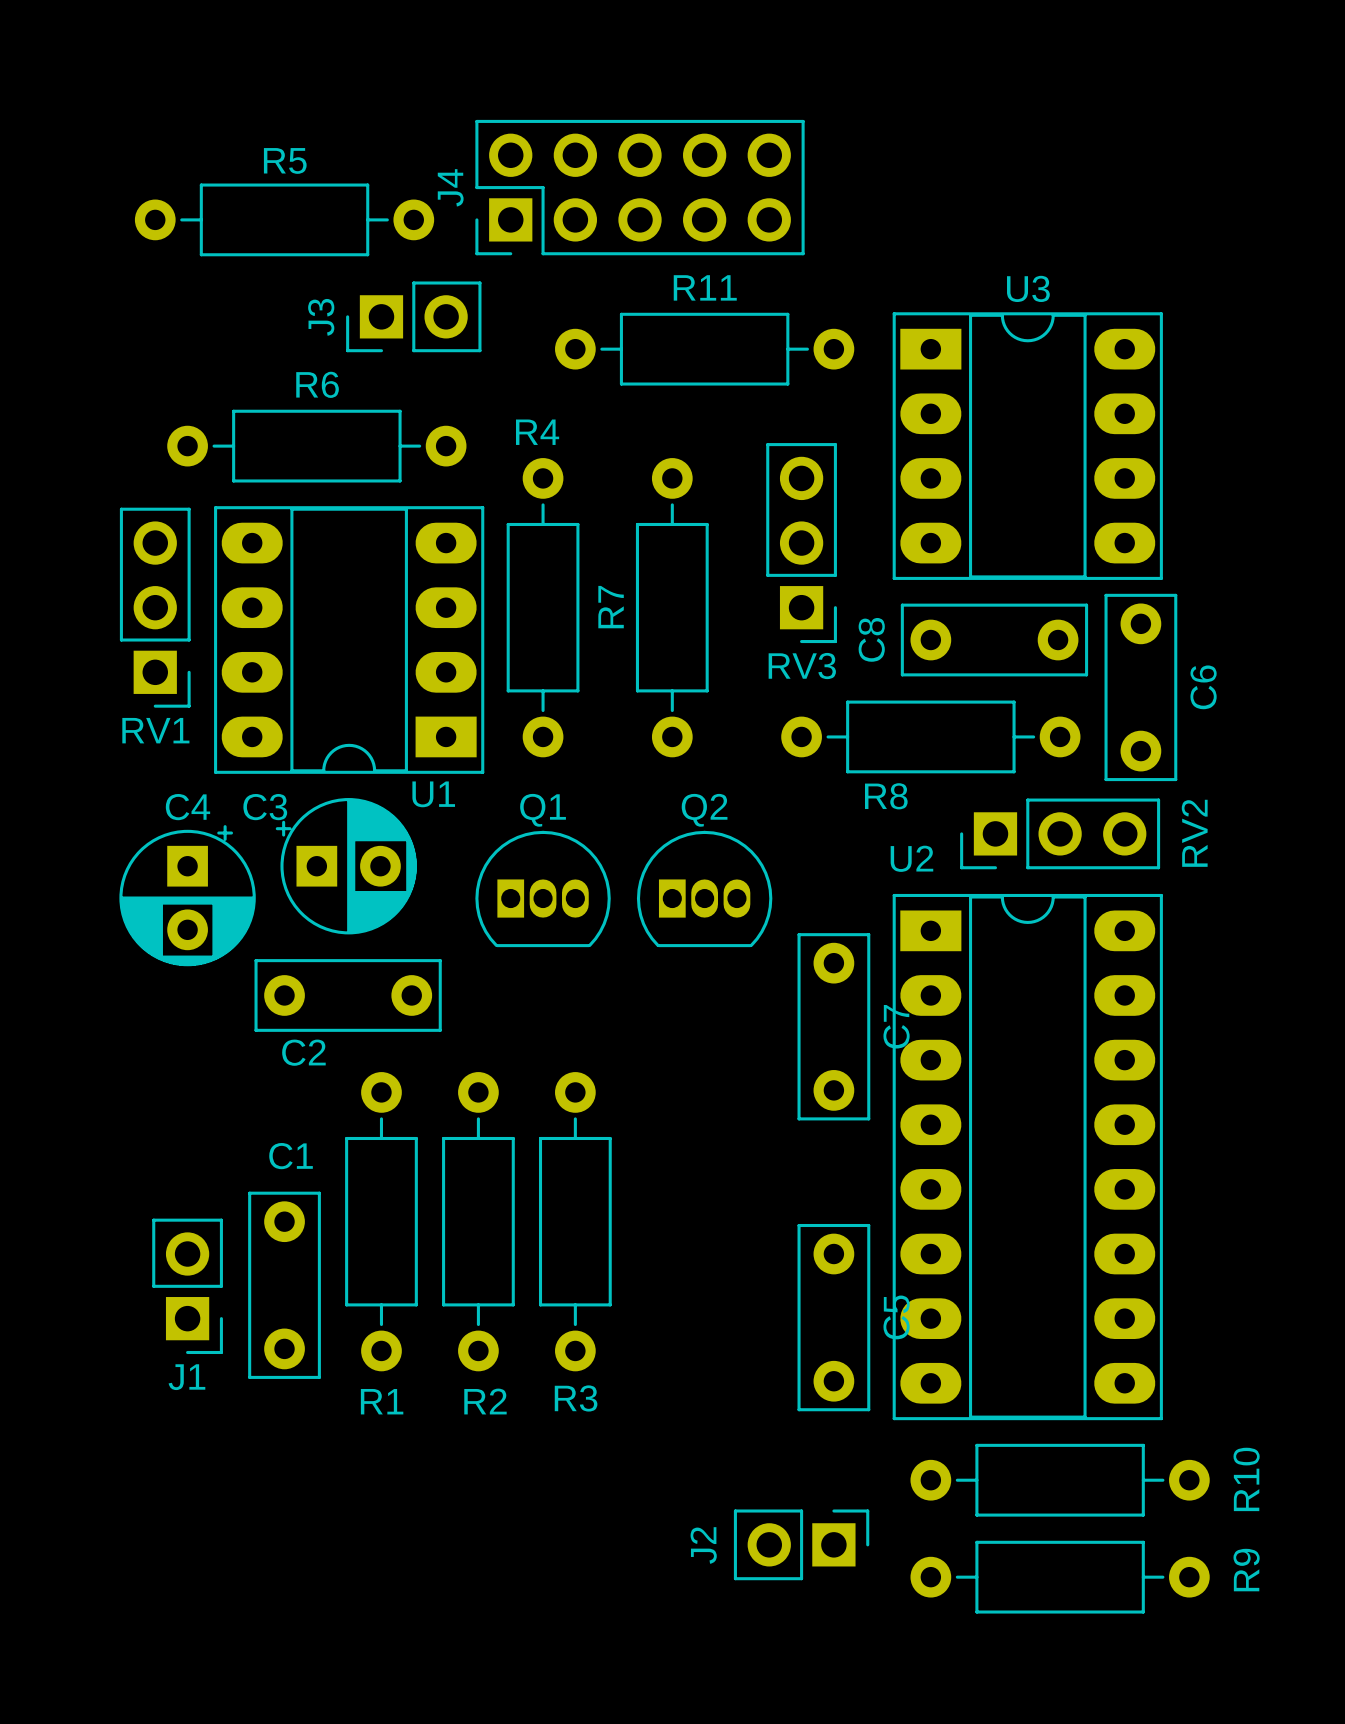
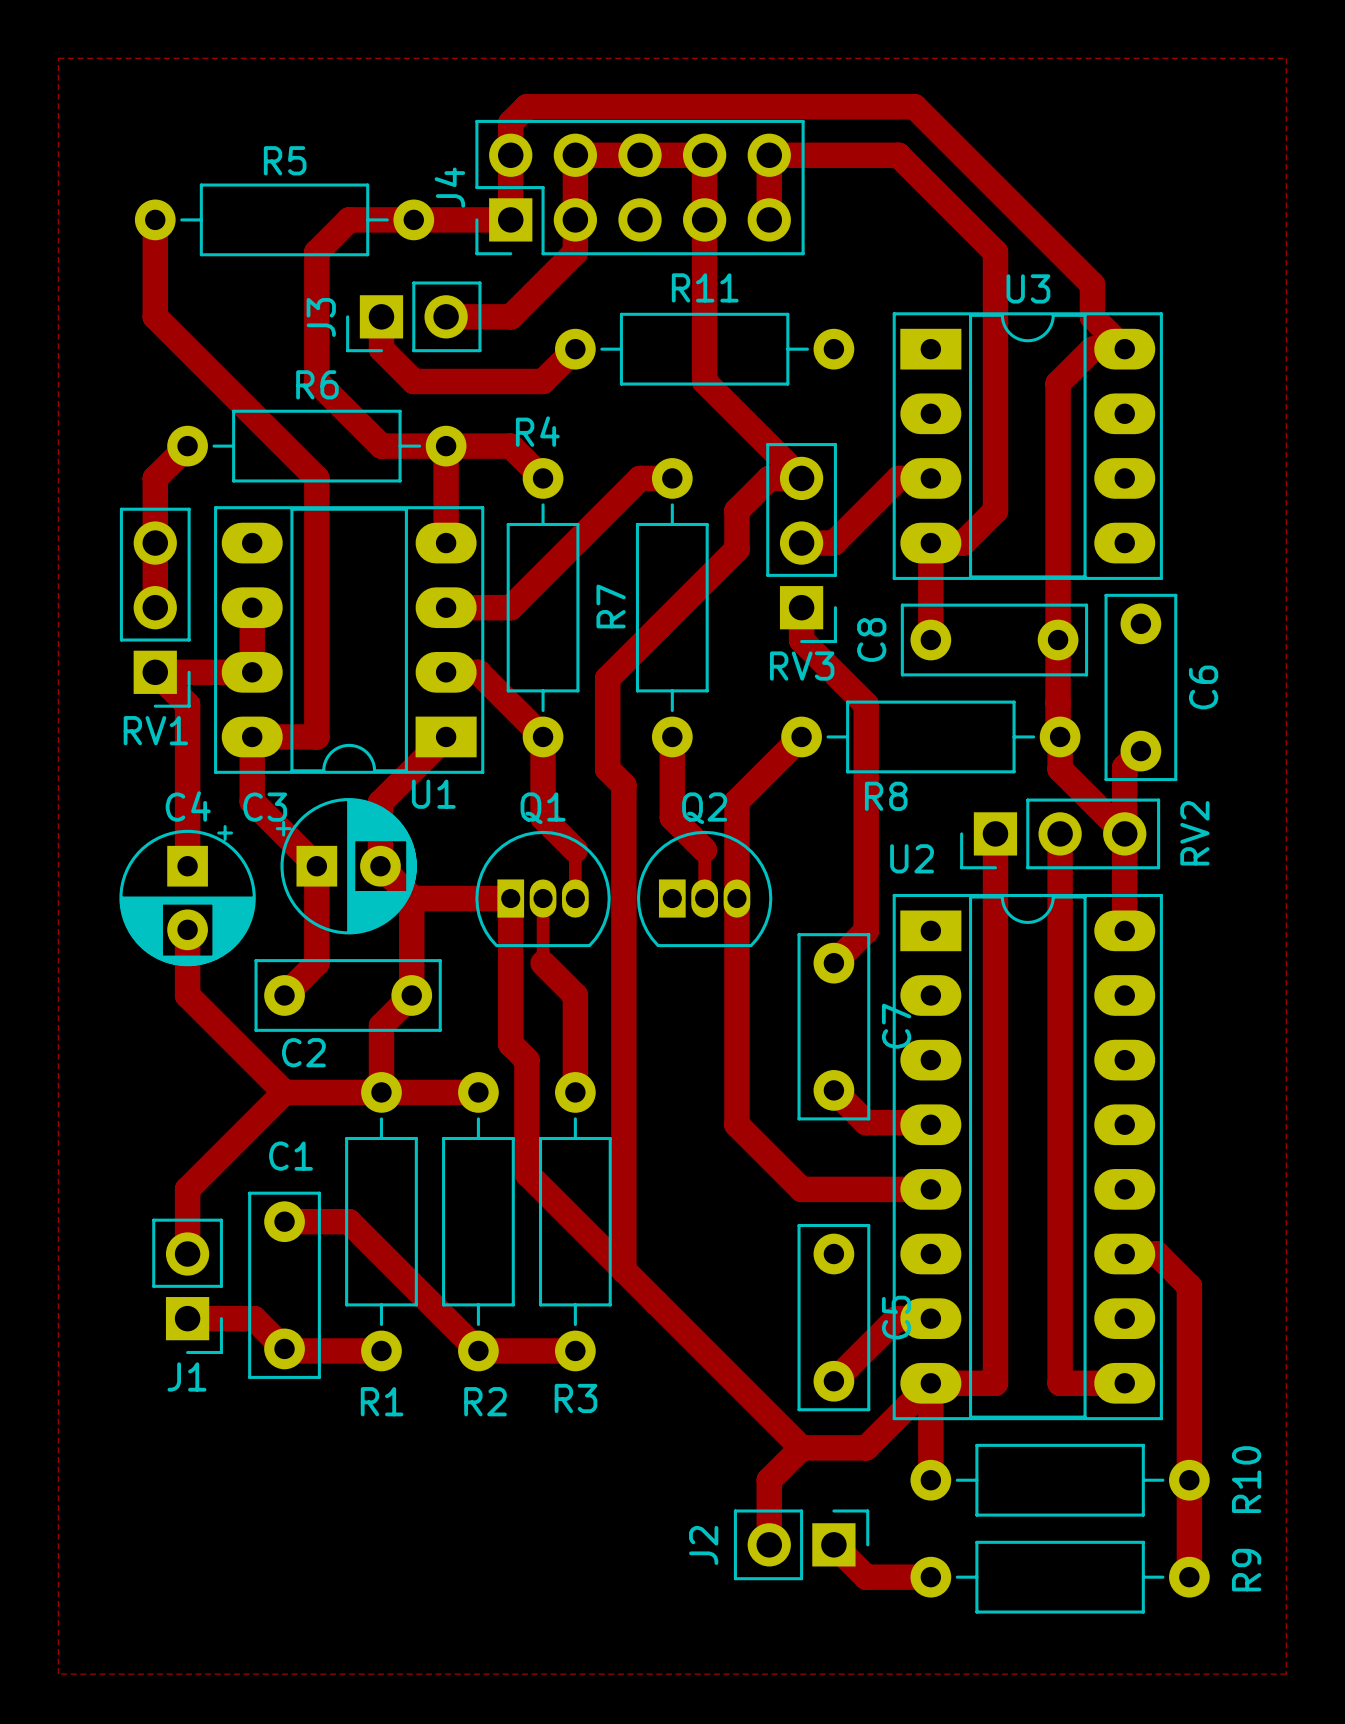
zone outline: none -> (58, 58) (58, 1674) (1286, 1674) (1286, 58) (58, 58)
track: none -> (155, 219) (155, 316) (316, 478) (316, 736) (252, 736) (252, 801) (316, 866) (316, 963) (284, 995)
track: none -> (769, 219) (769, 155) (898, 155) (995, 252) (995, 510) (963, 543) (930, 543) (930, 640)
track: none -> (381, 316) (381, 349) (413, 381) (543, 381) (575, 349)
track: none -> (446, 316) (510, 316) (575, 252) (575, 155) (704, 155) (704, 381) (801, 478) (769, 478) (736, 510) (736, 549) (607, 678) (607, 769) (623, 785) (623, 1270)
track: none -> (187, 446) (155, 478) (155, 607)
track: none -> (446, 446) (446, 543)
track: none -> (543, 478) (510, 446) (381, 446) (316, 381) (316, 252) (349, 219) (510, 219) (510, 122) (526, 106) (914, 106) (1092, 284) (1092, 316) (1124, 349) (1092, 349) (1058, 383) (1058, 734) (1060, 736) (1060, 769) (1124, 833)
track: none -> (672, 478) (640, 478) (510, 607) (446, 607)
track: none -> (930, 478) (898, 478) (833, 543) (801, 543)
track: none -> (252, 607) (252, 672) (155, 672) (187, 704) (187, 866)
track: none -> (801, 607) (801, 640) (866, 704) (866, 930) (833, 963)
track: none -> (446, 672) (478, 672) (543, 736) (543, 817) (575, 850) (575, 898)
track: none -> (446, 736) (380, 802) (380, 866) (412, 898) (510, 898) (510, 1043) (526, 1060) (526, 1173) (801, 1447)
track: none -> (672, 736) (672, 817) (704, 850) (704, 898)
track: none -> (801, 736) (736, 801) (736, 1124) (801, 1189) (930, 1189)
track: none -> (1140, 751) (1124, 767) (1124, 930)
track: none -> (995, 833) (995, 1383) (930, 1383)
track: none -> (1060, 833) (1060, 1383) (1124, 1383)
track: none -> (411, 897) (411, 995) (381, 1025) (381, 1092)
track: none -> (543, 898) (543, 963) (575, 995) (575, 1092)
track: none -> (187, 929) (187, 995) (284, 1092)
track: none -> (833, 1090) (866, 1122) (928, 1122) (930, 1124)
track: none -> (284, 1092) (478, 1092)
track: none -> (284, 1092) (187, 1189) (187, 1254)
track: none -> (284, 1221) (349, 1221) (478, 1350) (575, 1350)
track: none -> (1124, 1254) (1157, 1254) (1189, 1286) (1189, 1577)
track: none -> (187, 1318) (254, 1318) (286, 1350) (381, 1350)
track: none -> (930, 1318) (896, 1318) (833, 1381)
track: none -> (930, 1383) (866, 1447) (801, 1447)
track: none -> (930, 1383) (930, 1480)
track: none -> (801, 1447) (769, 1480) (769, 1544)
track: none -> (833, 1544) (866, 1577) (930, 1577)

